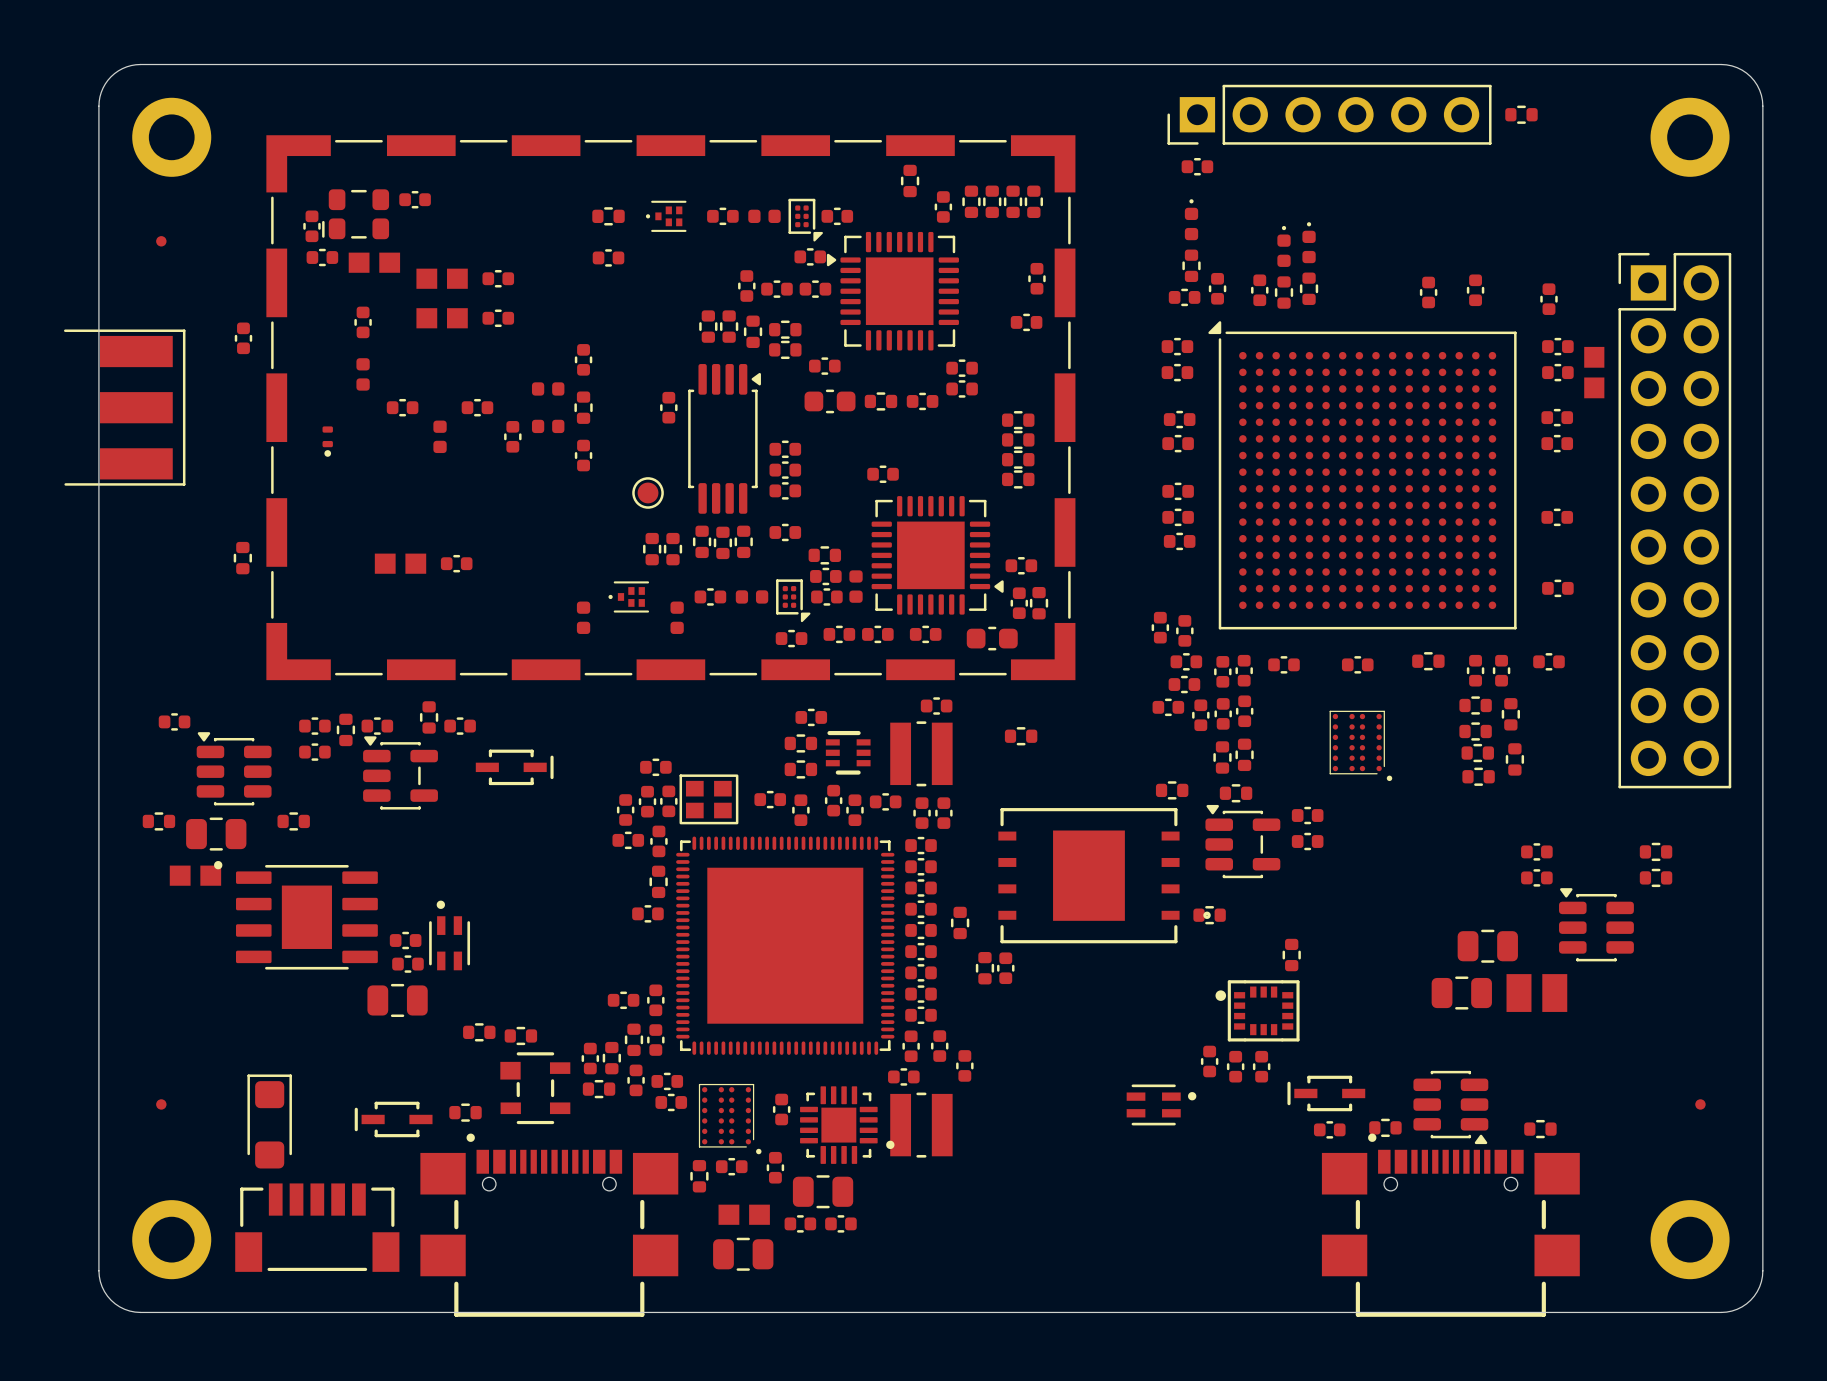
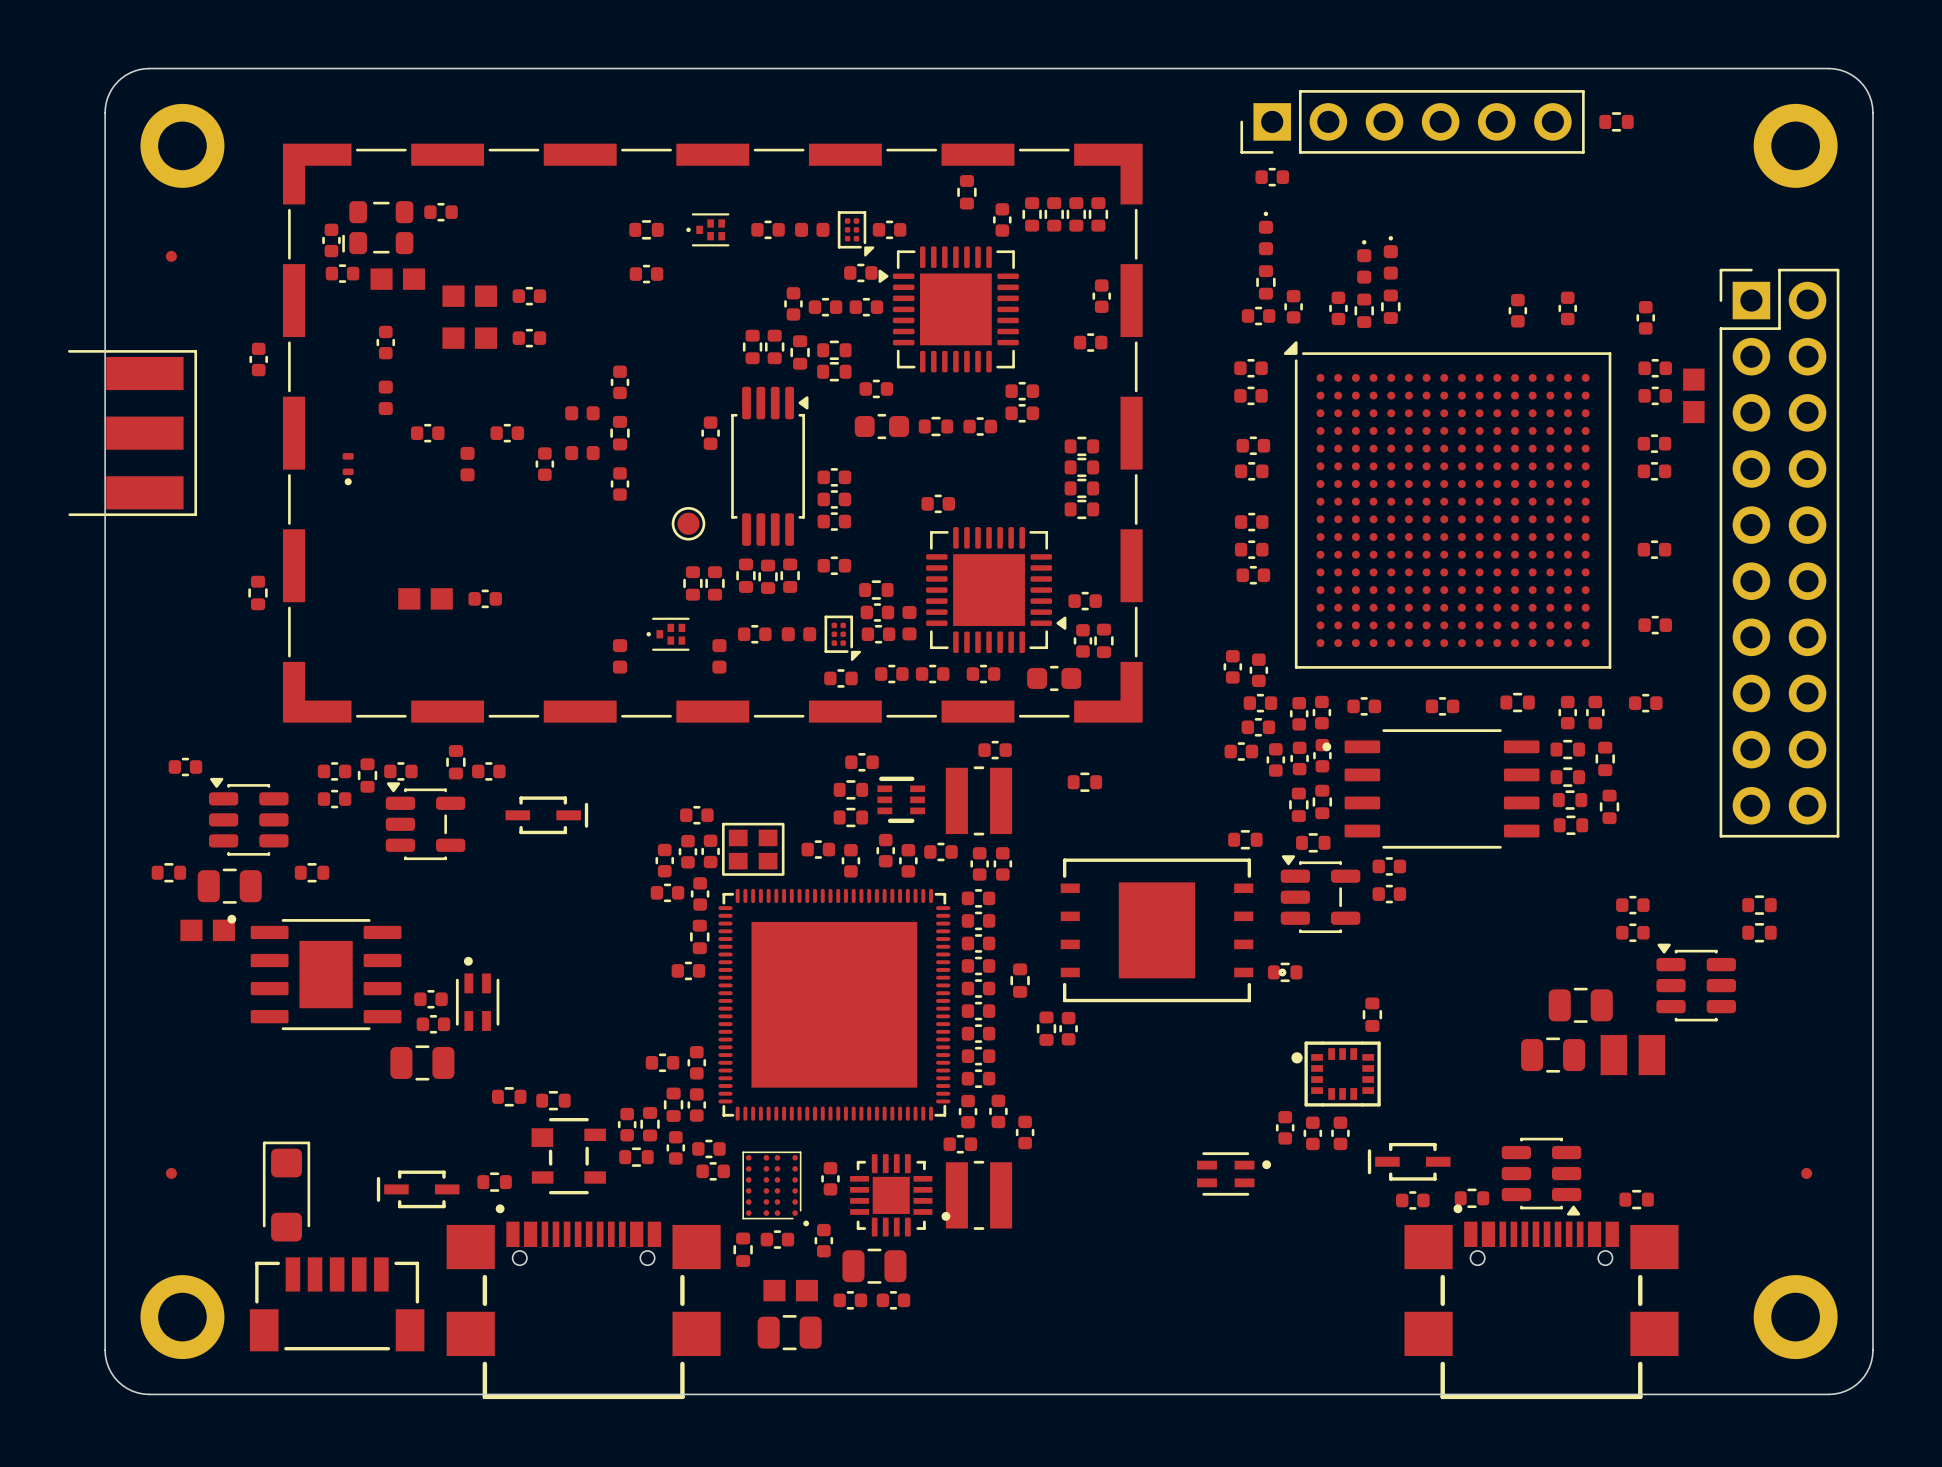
part footprint: [1329, 710, 1393, 782] -> [1322, 729, 1540, 849]

